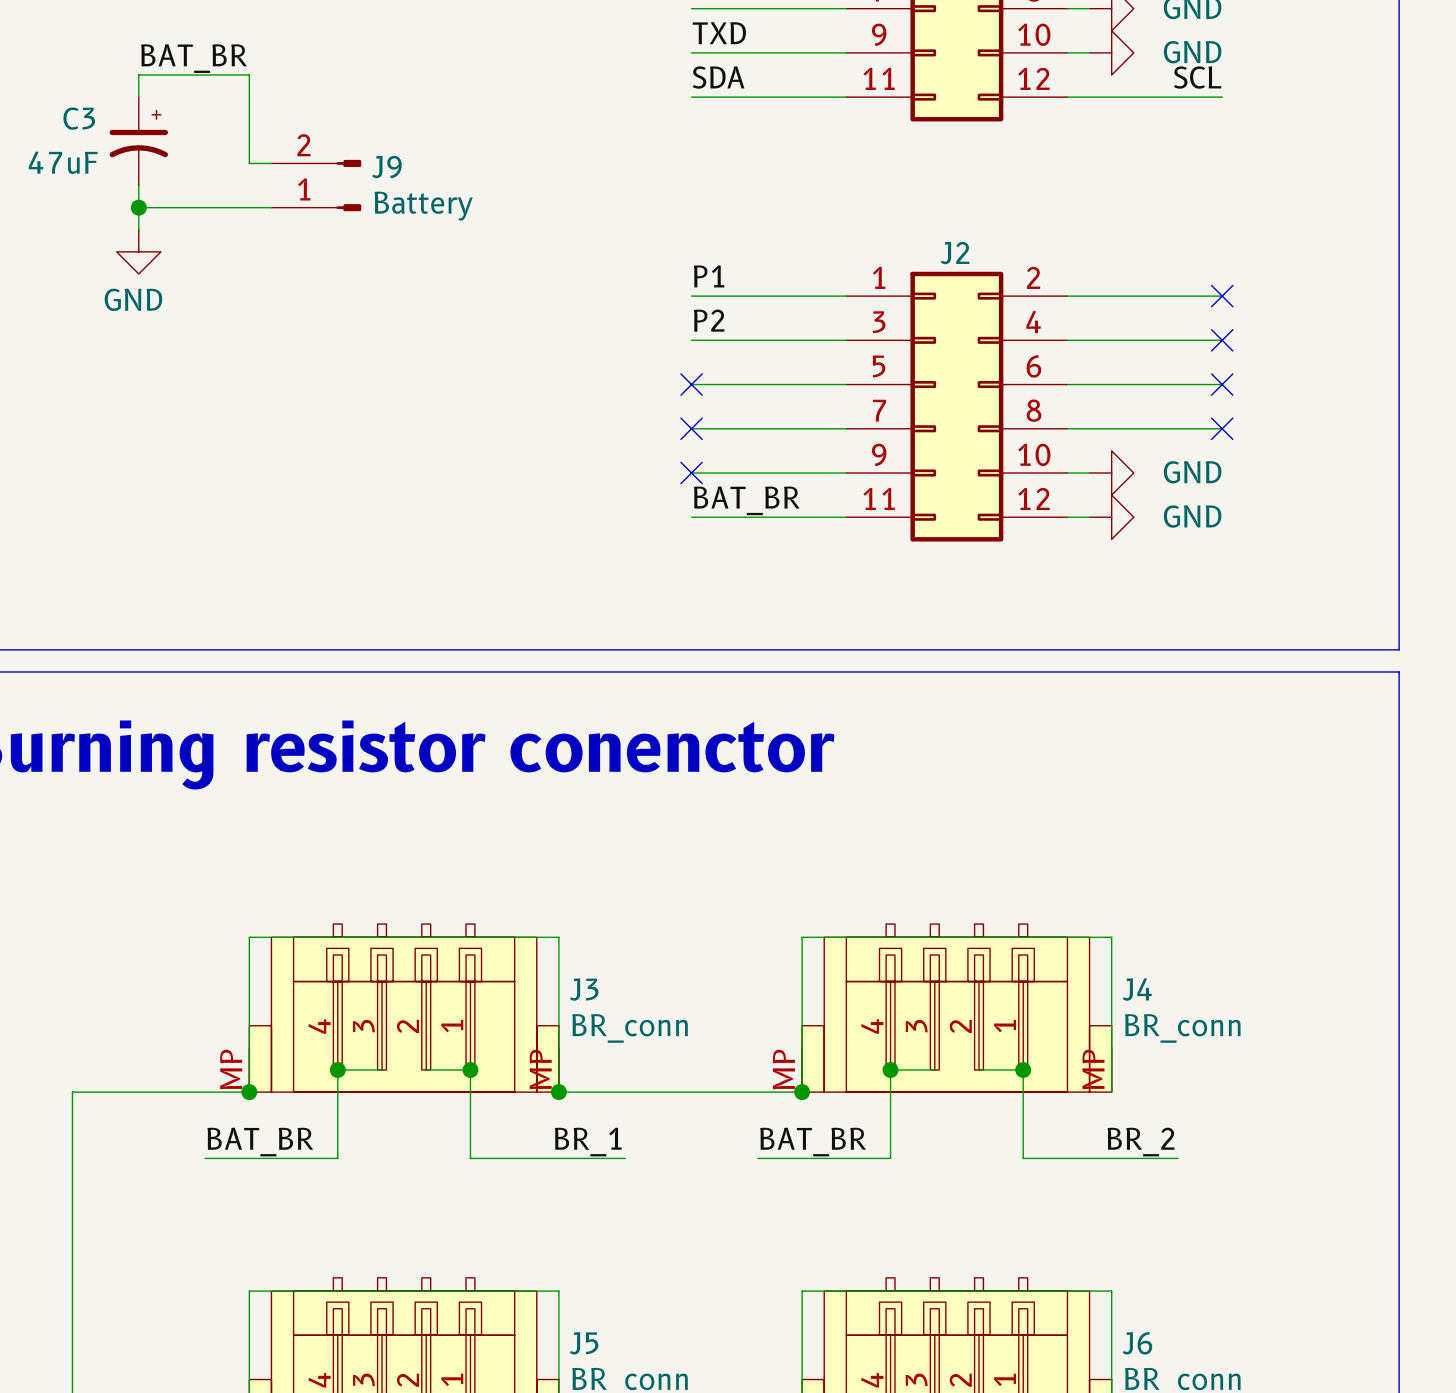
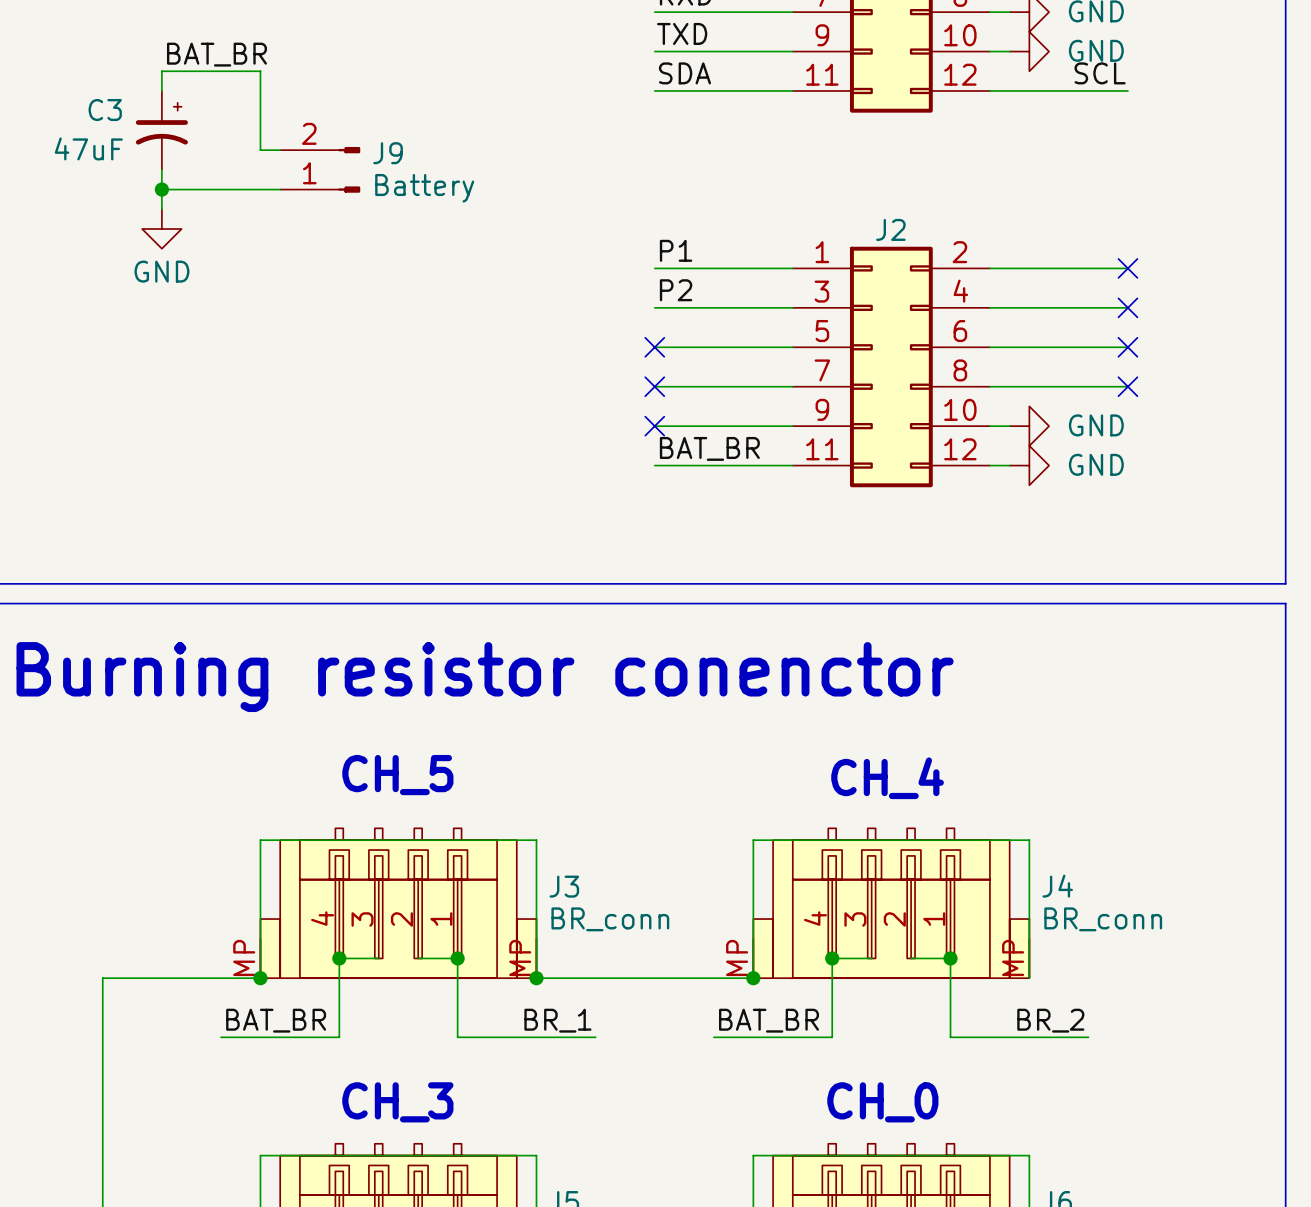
text: none -> CH_5 (397, 775)
text: none -> CH_4 (887, 778)
text: none -> CH_3 (397, 1102)
text: none -> CH_0 (882, 1102)

